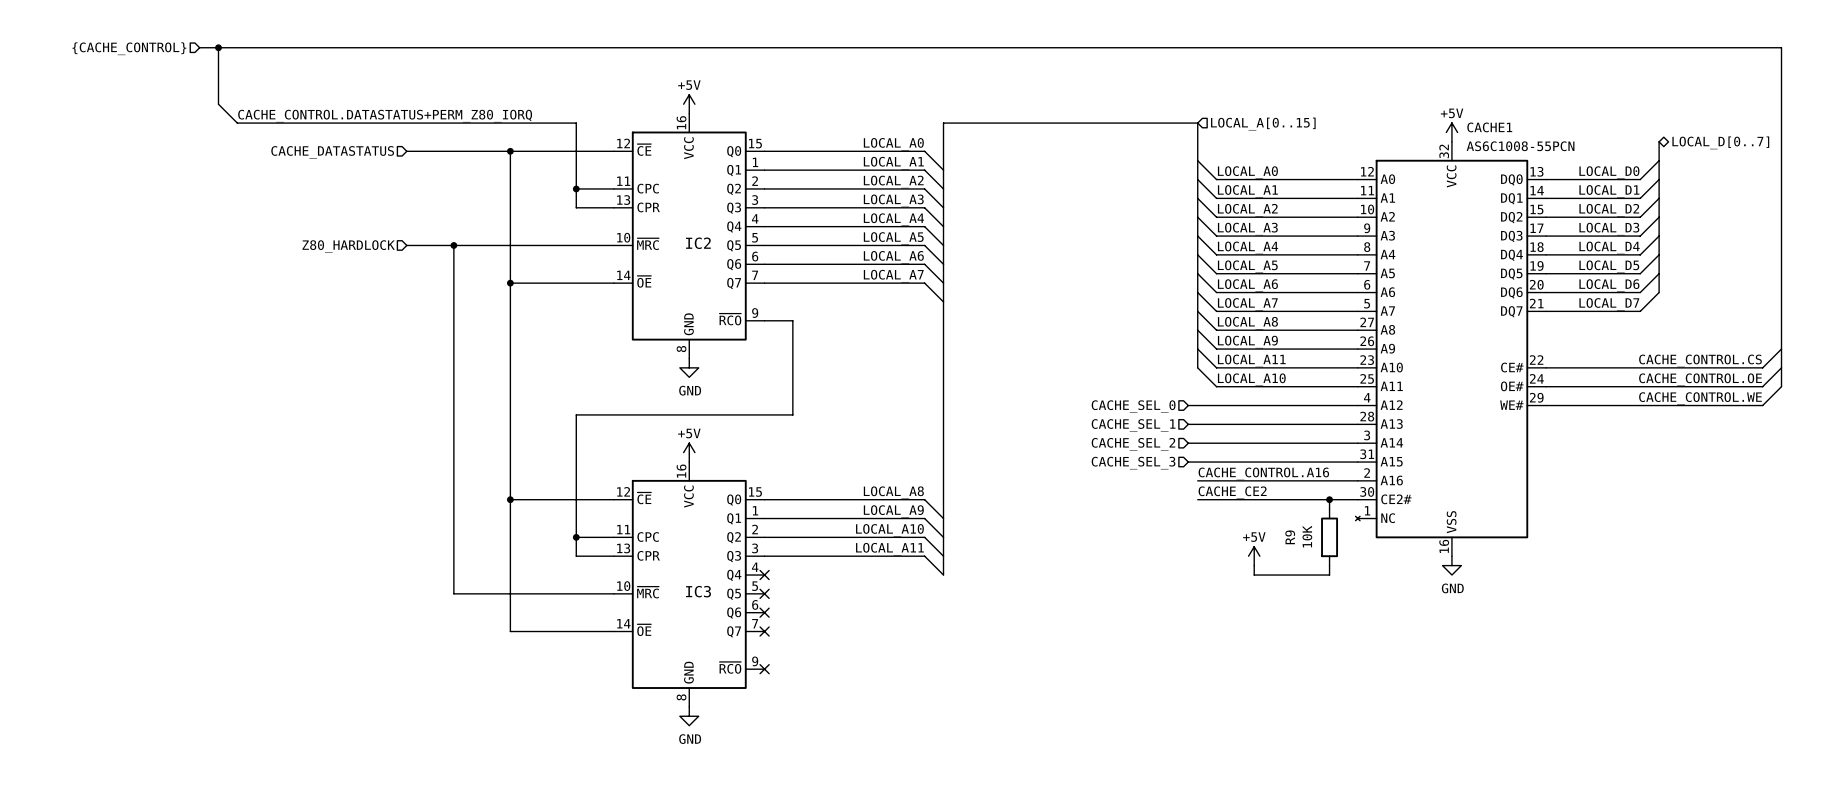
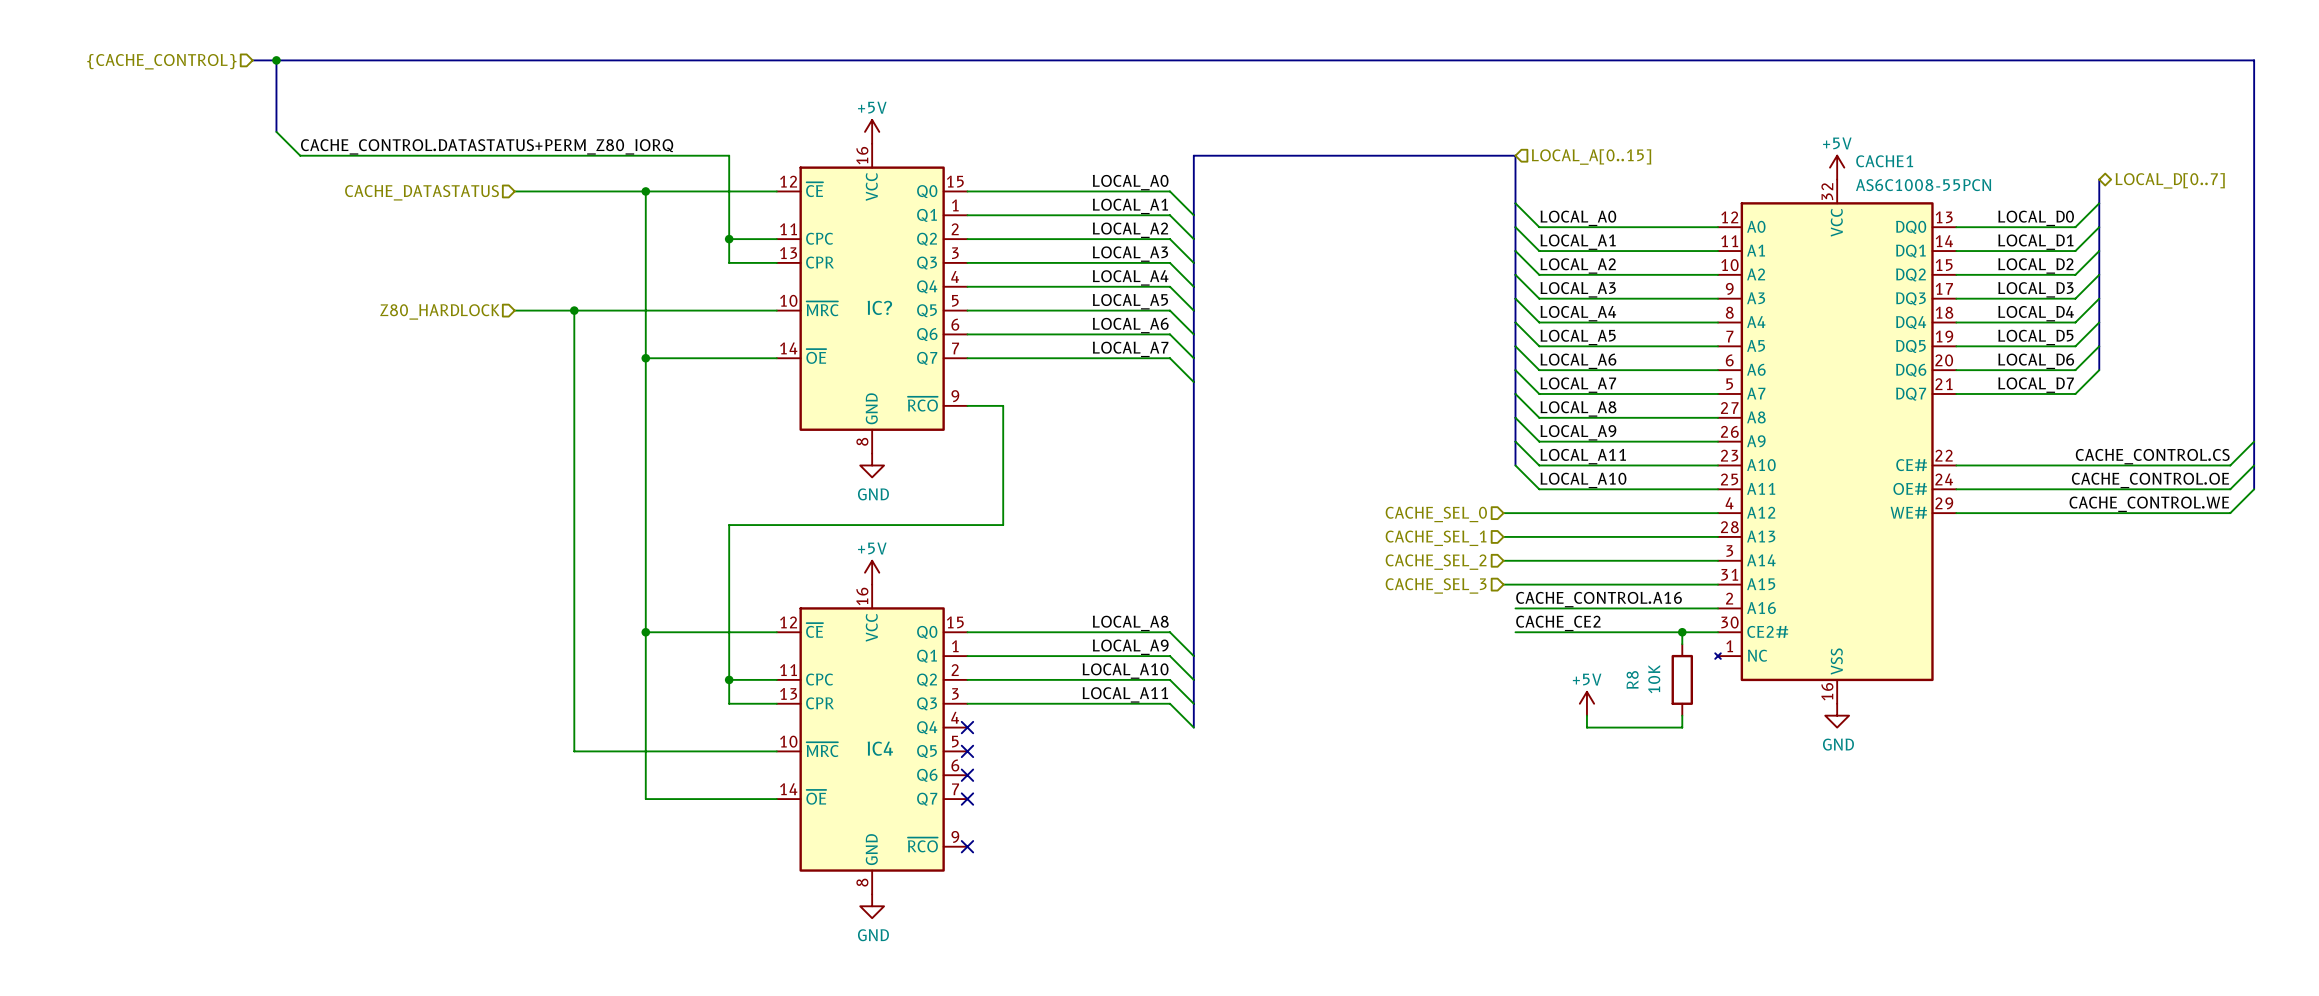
IC2 name: IC2 (698, 243) -> IC? (879, 307)
R9 name: R9 (1290, 537) -> R8 (1632, 679)
IC3 name: IC3 (698, 591) -> IC4 (880, 748)

